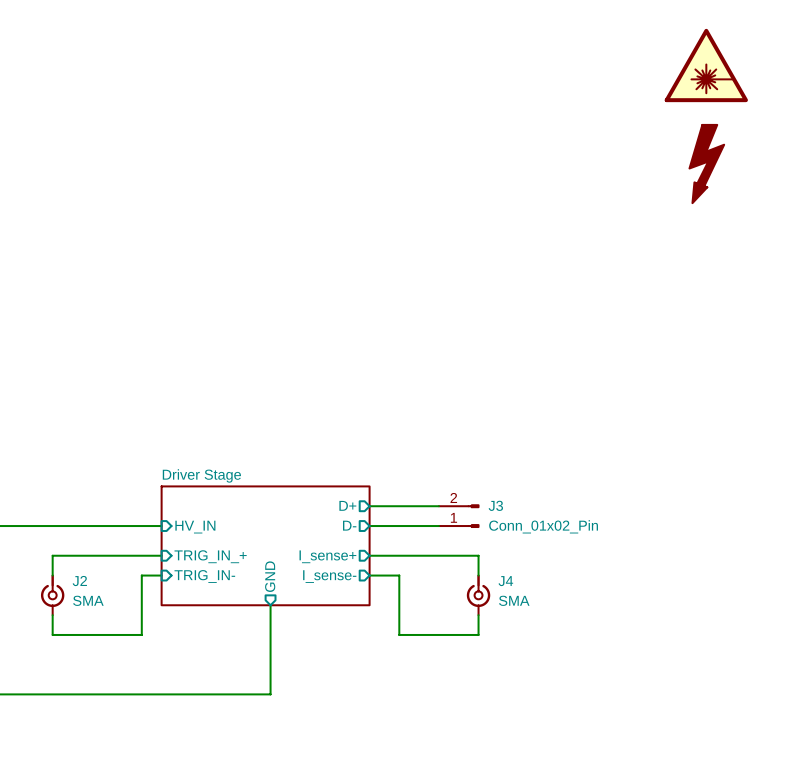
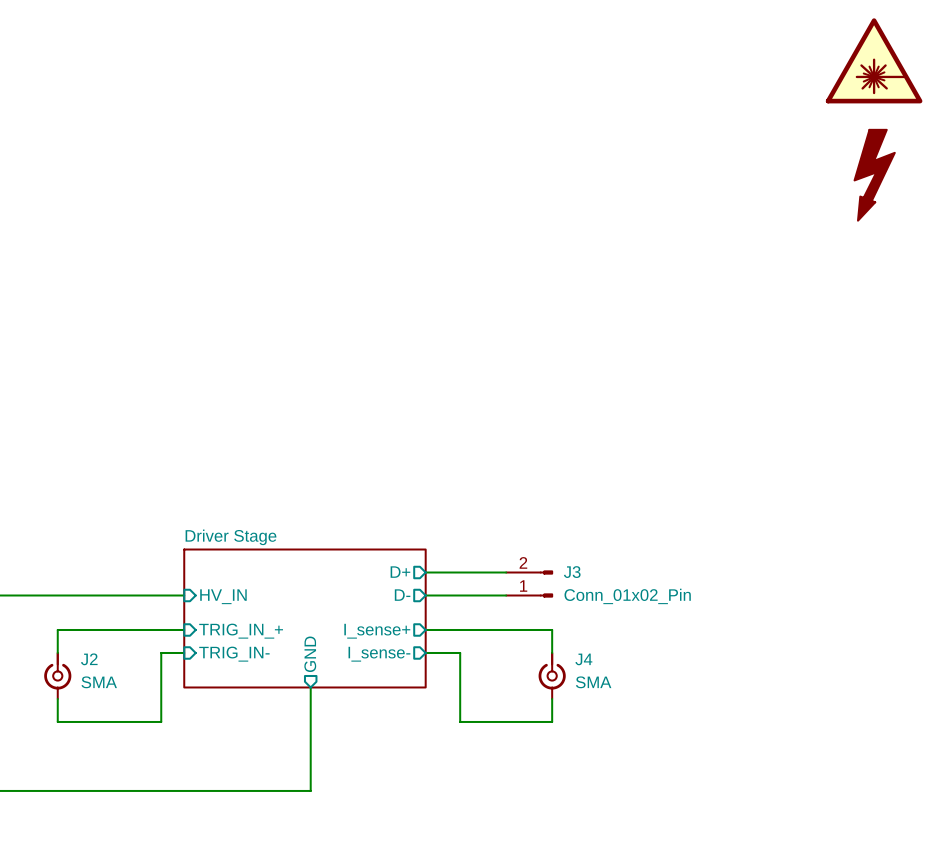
power symbol position: (706, 65) -> (874, 60)
power symbol position: (706, 164) -> (874, 175)

